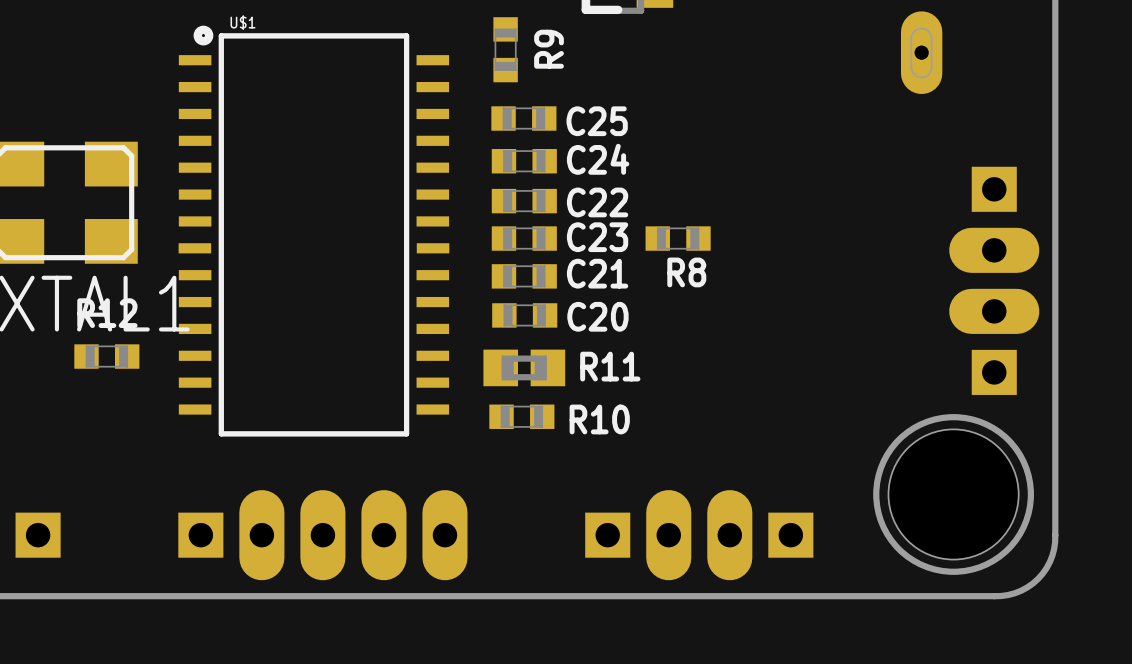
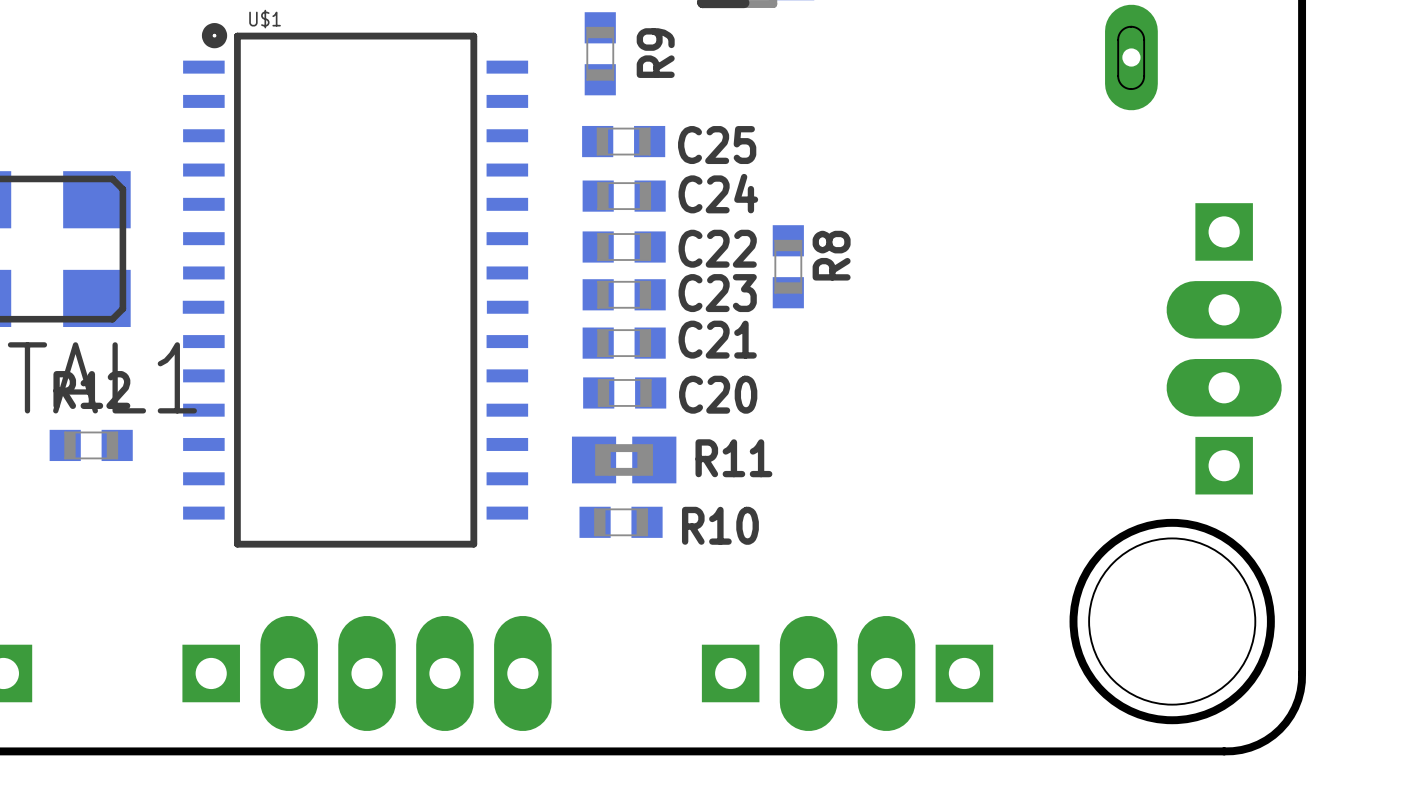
R8 rotation: 0° (678, 238) -> 90° clockwise (788, 266)

